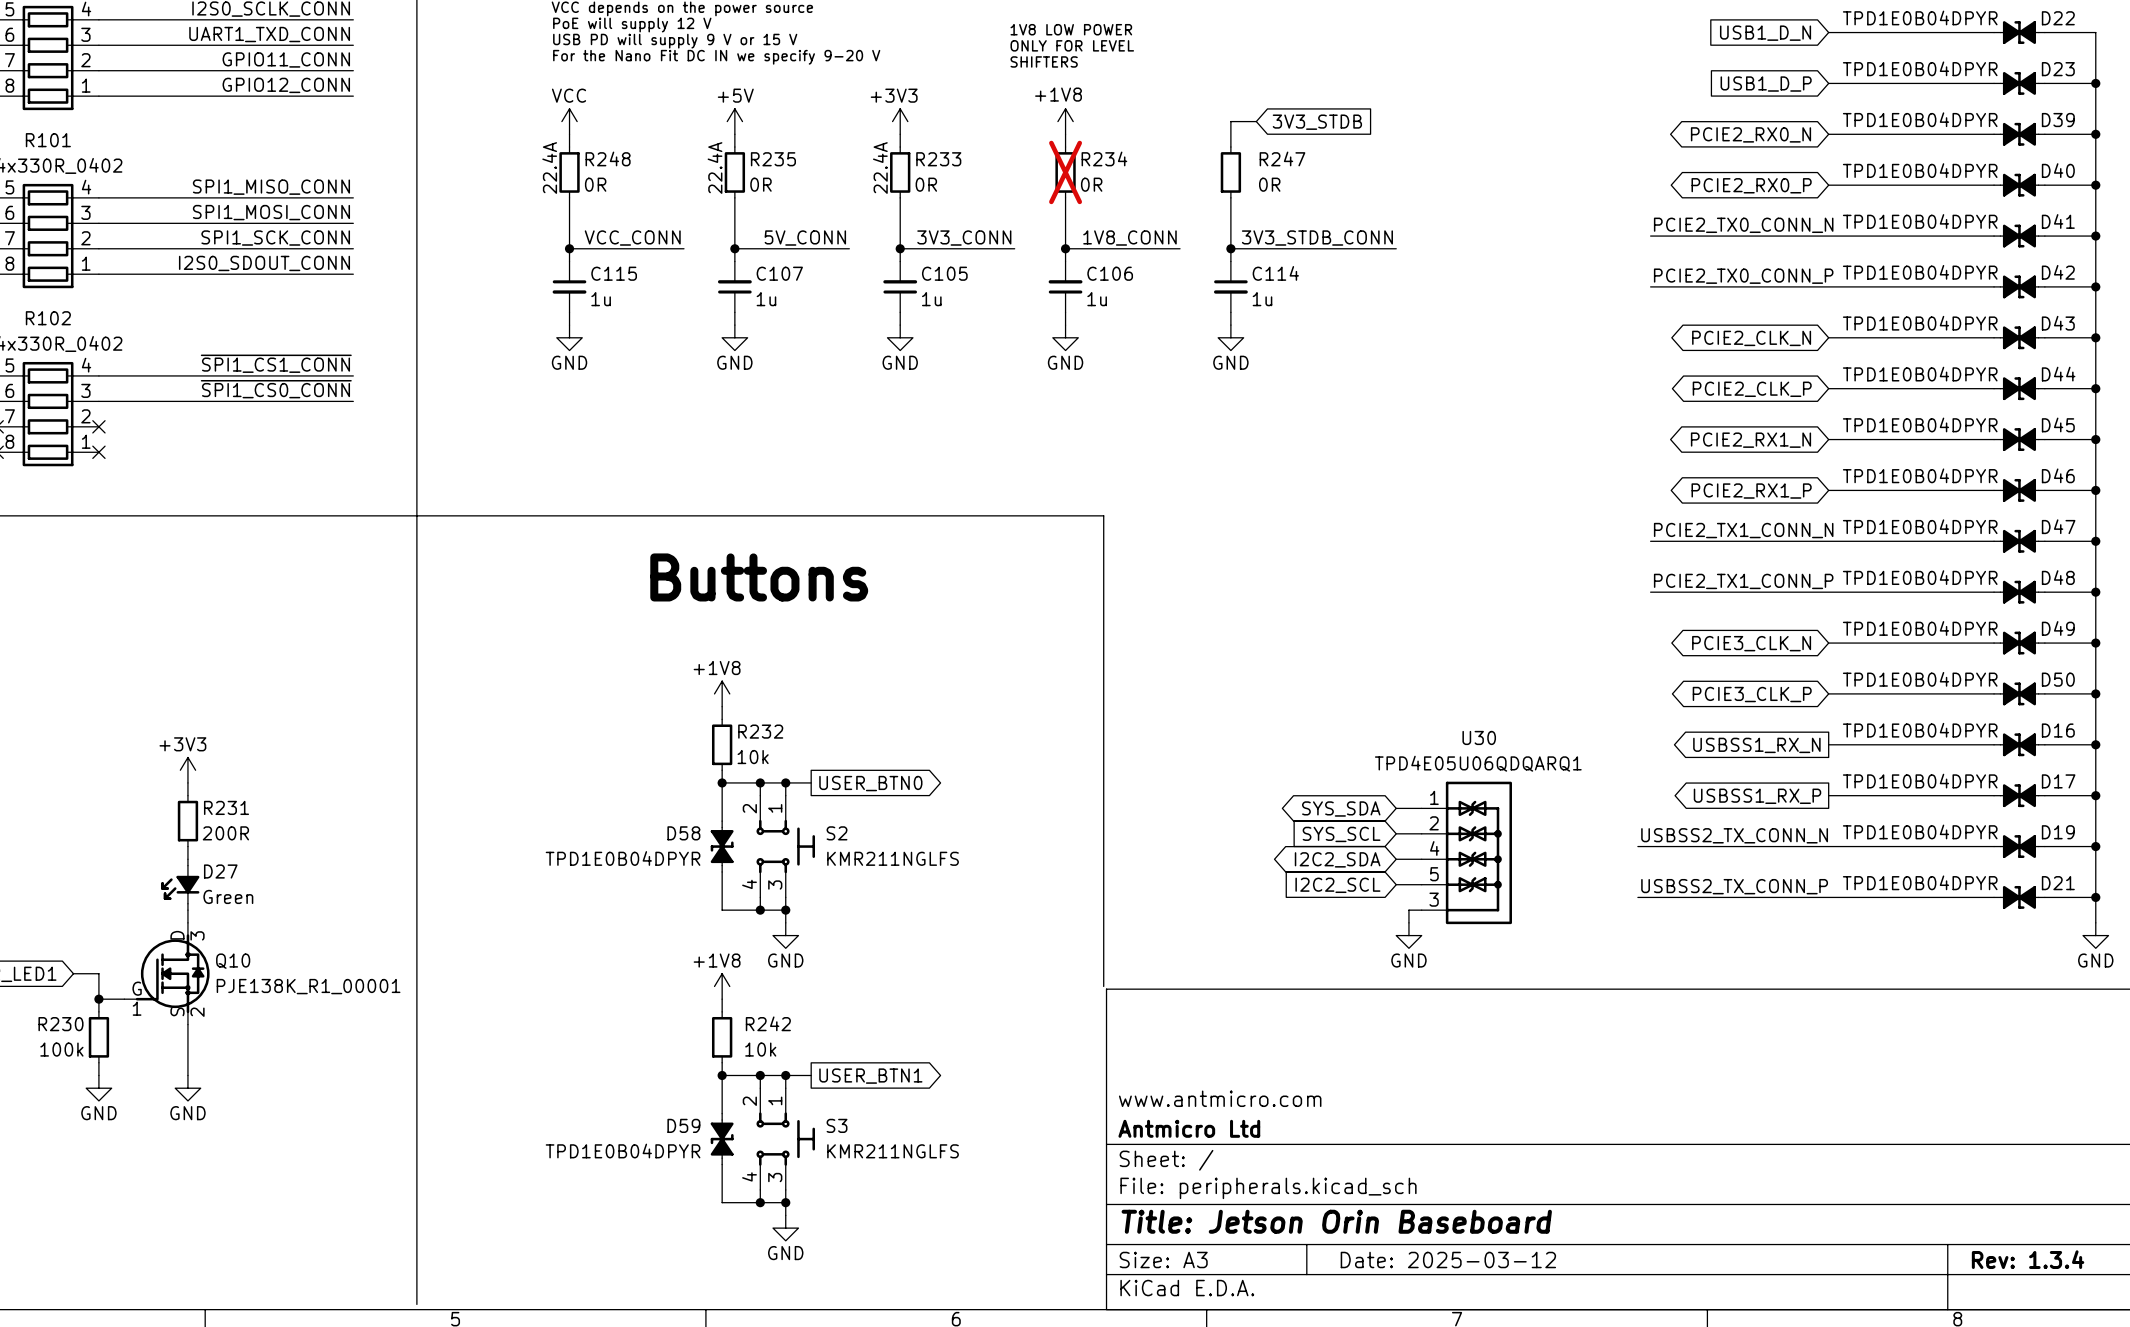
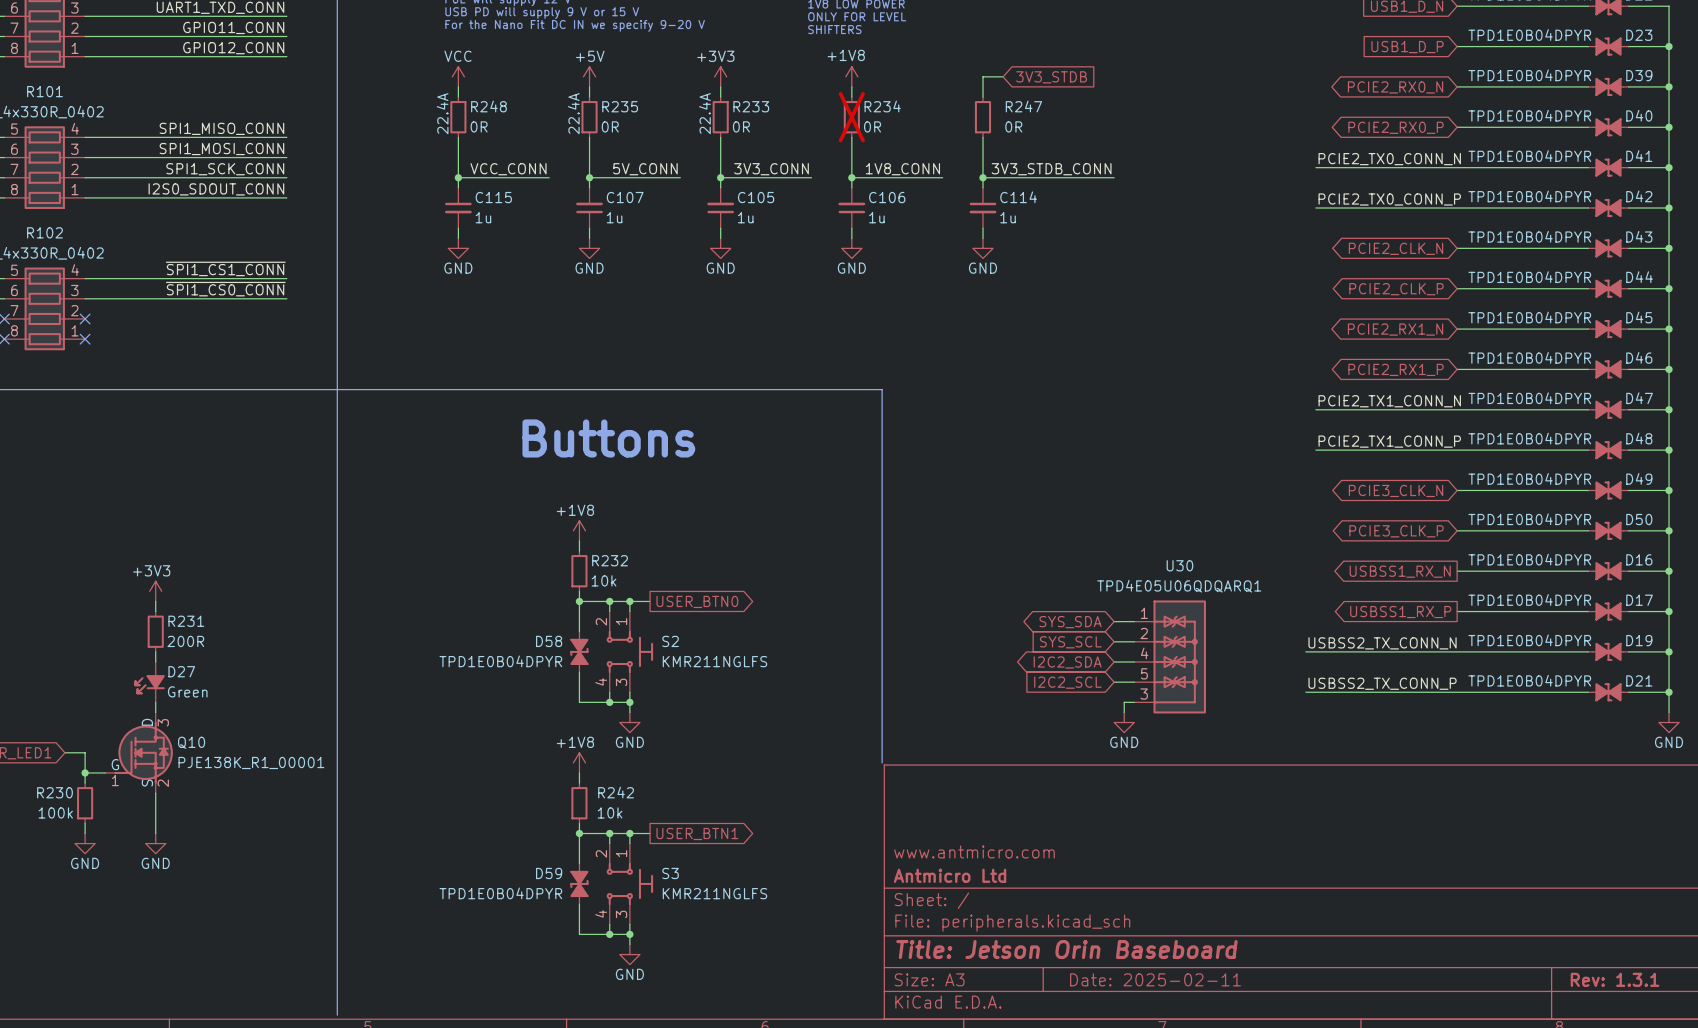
title block: Rev: 1.3.4 (2028, 1259) -> Rev: 1.3.1 (1615, 979)
title block: Date: 2025-03-12 (1448, 1260) -> Date: 2025-02-11 (1155, 979)

